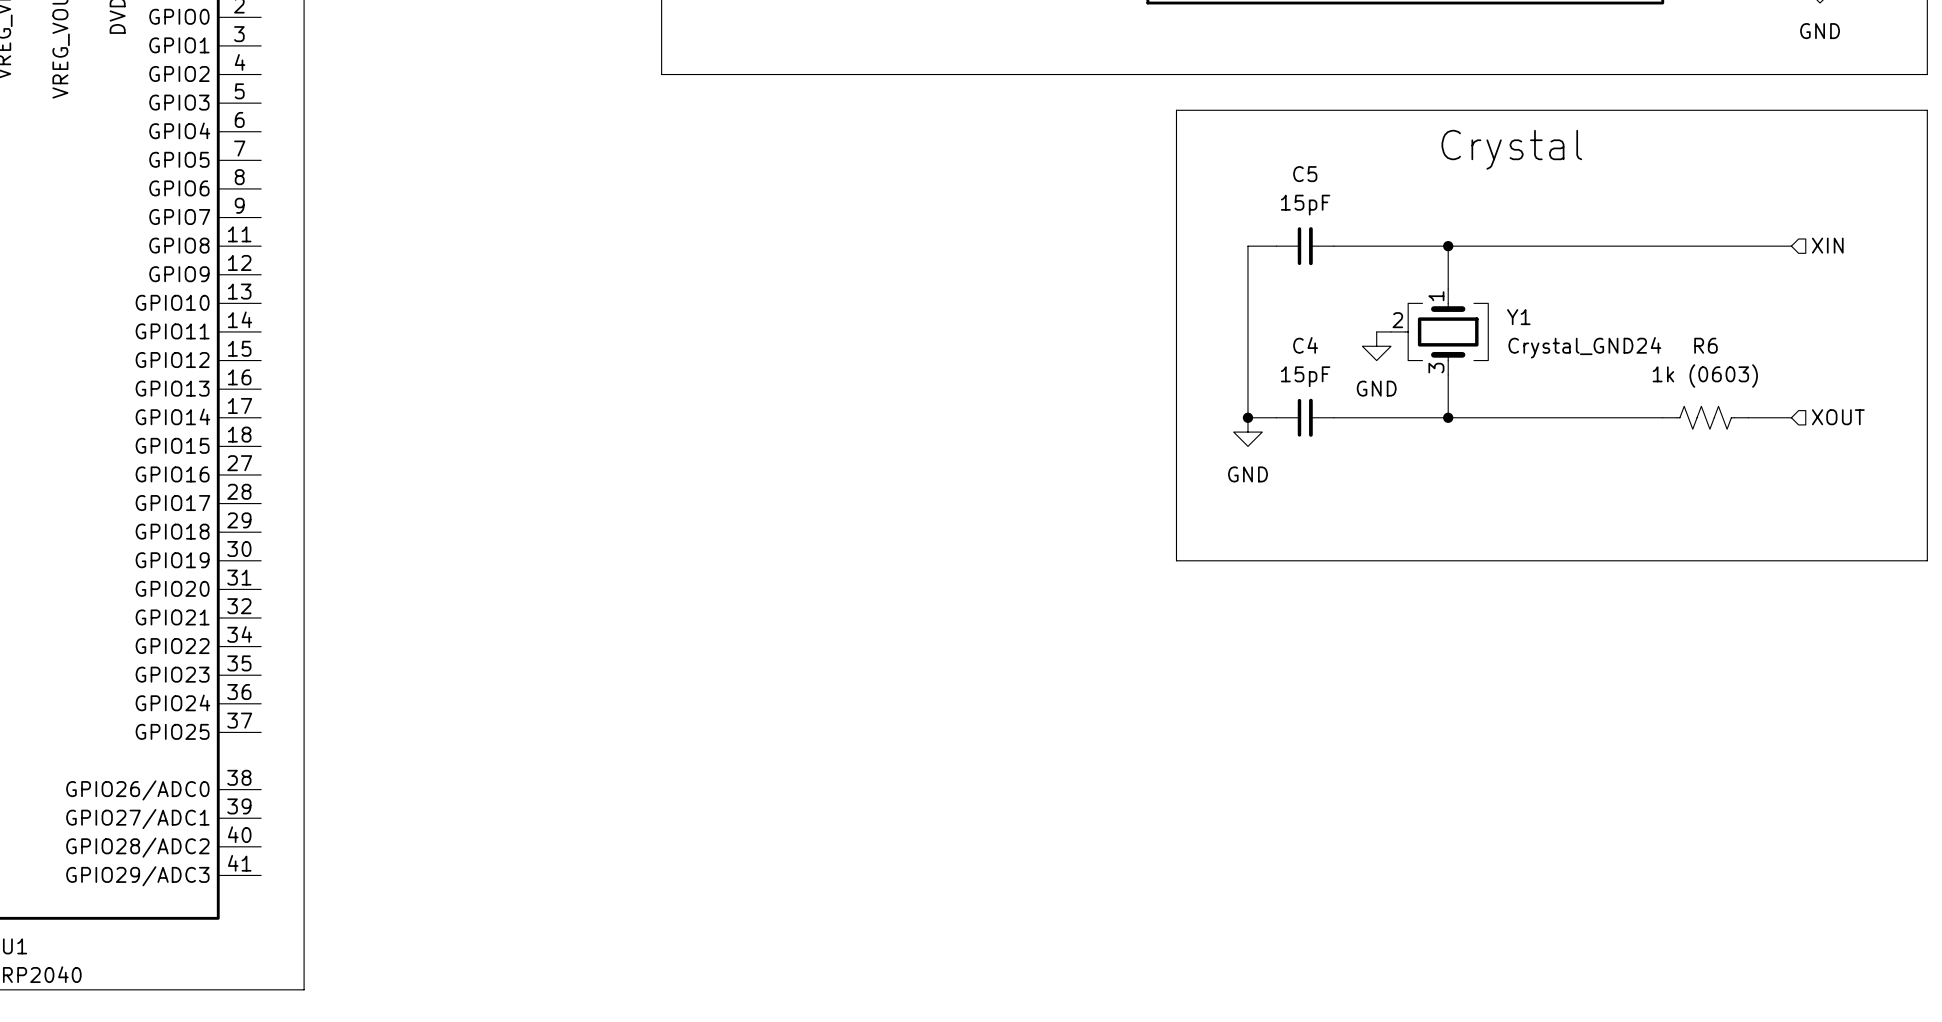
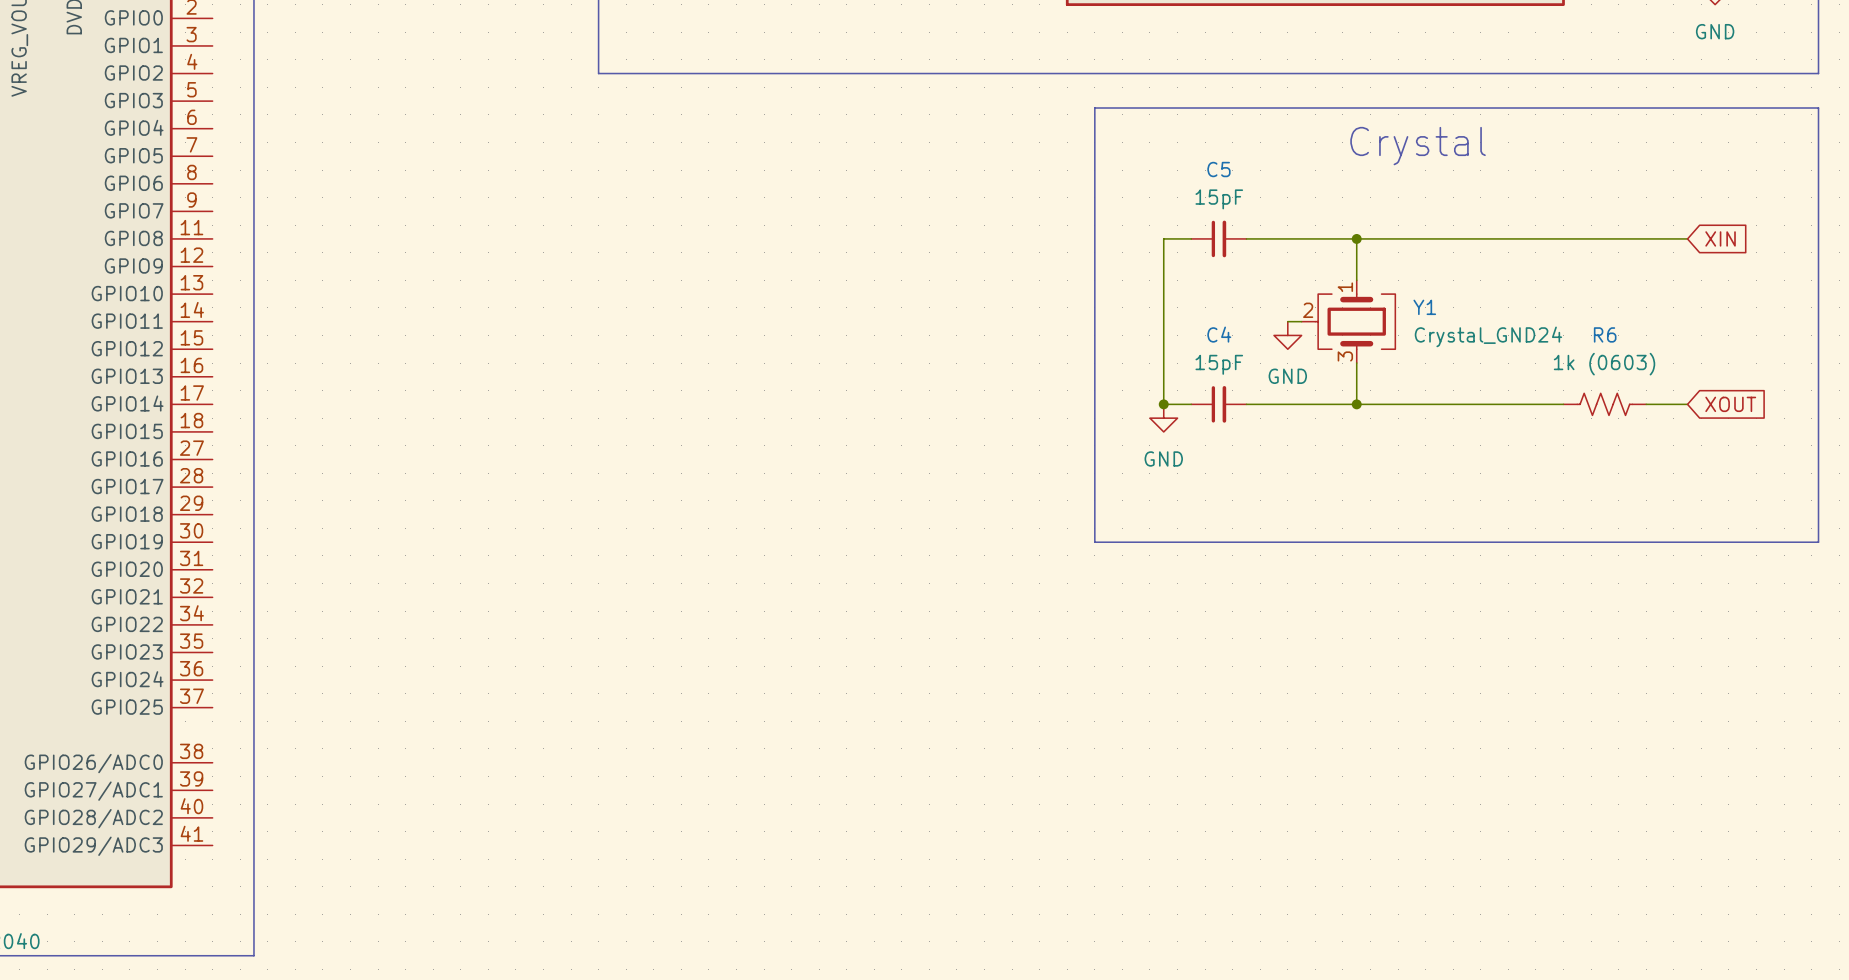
hierarchical label: XIN (1827, 245) -> none
global label: none -> XIN (1720, 238)
global label: none -> XOUT (1730, 404)
hierarchical label: XOUT (1838, 417) -> none

